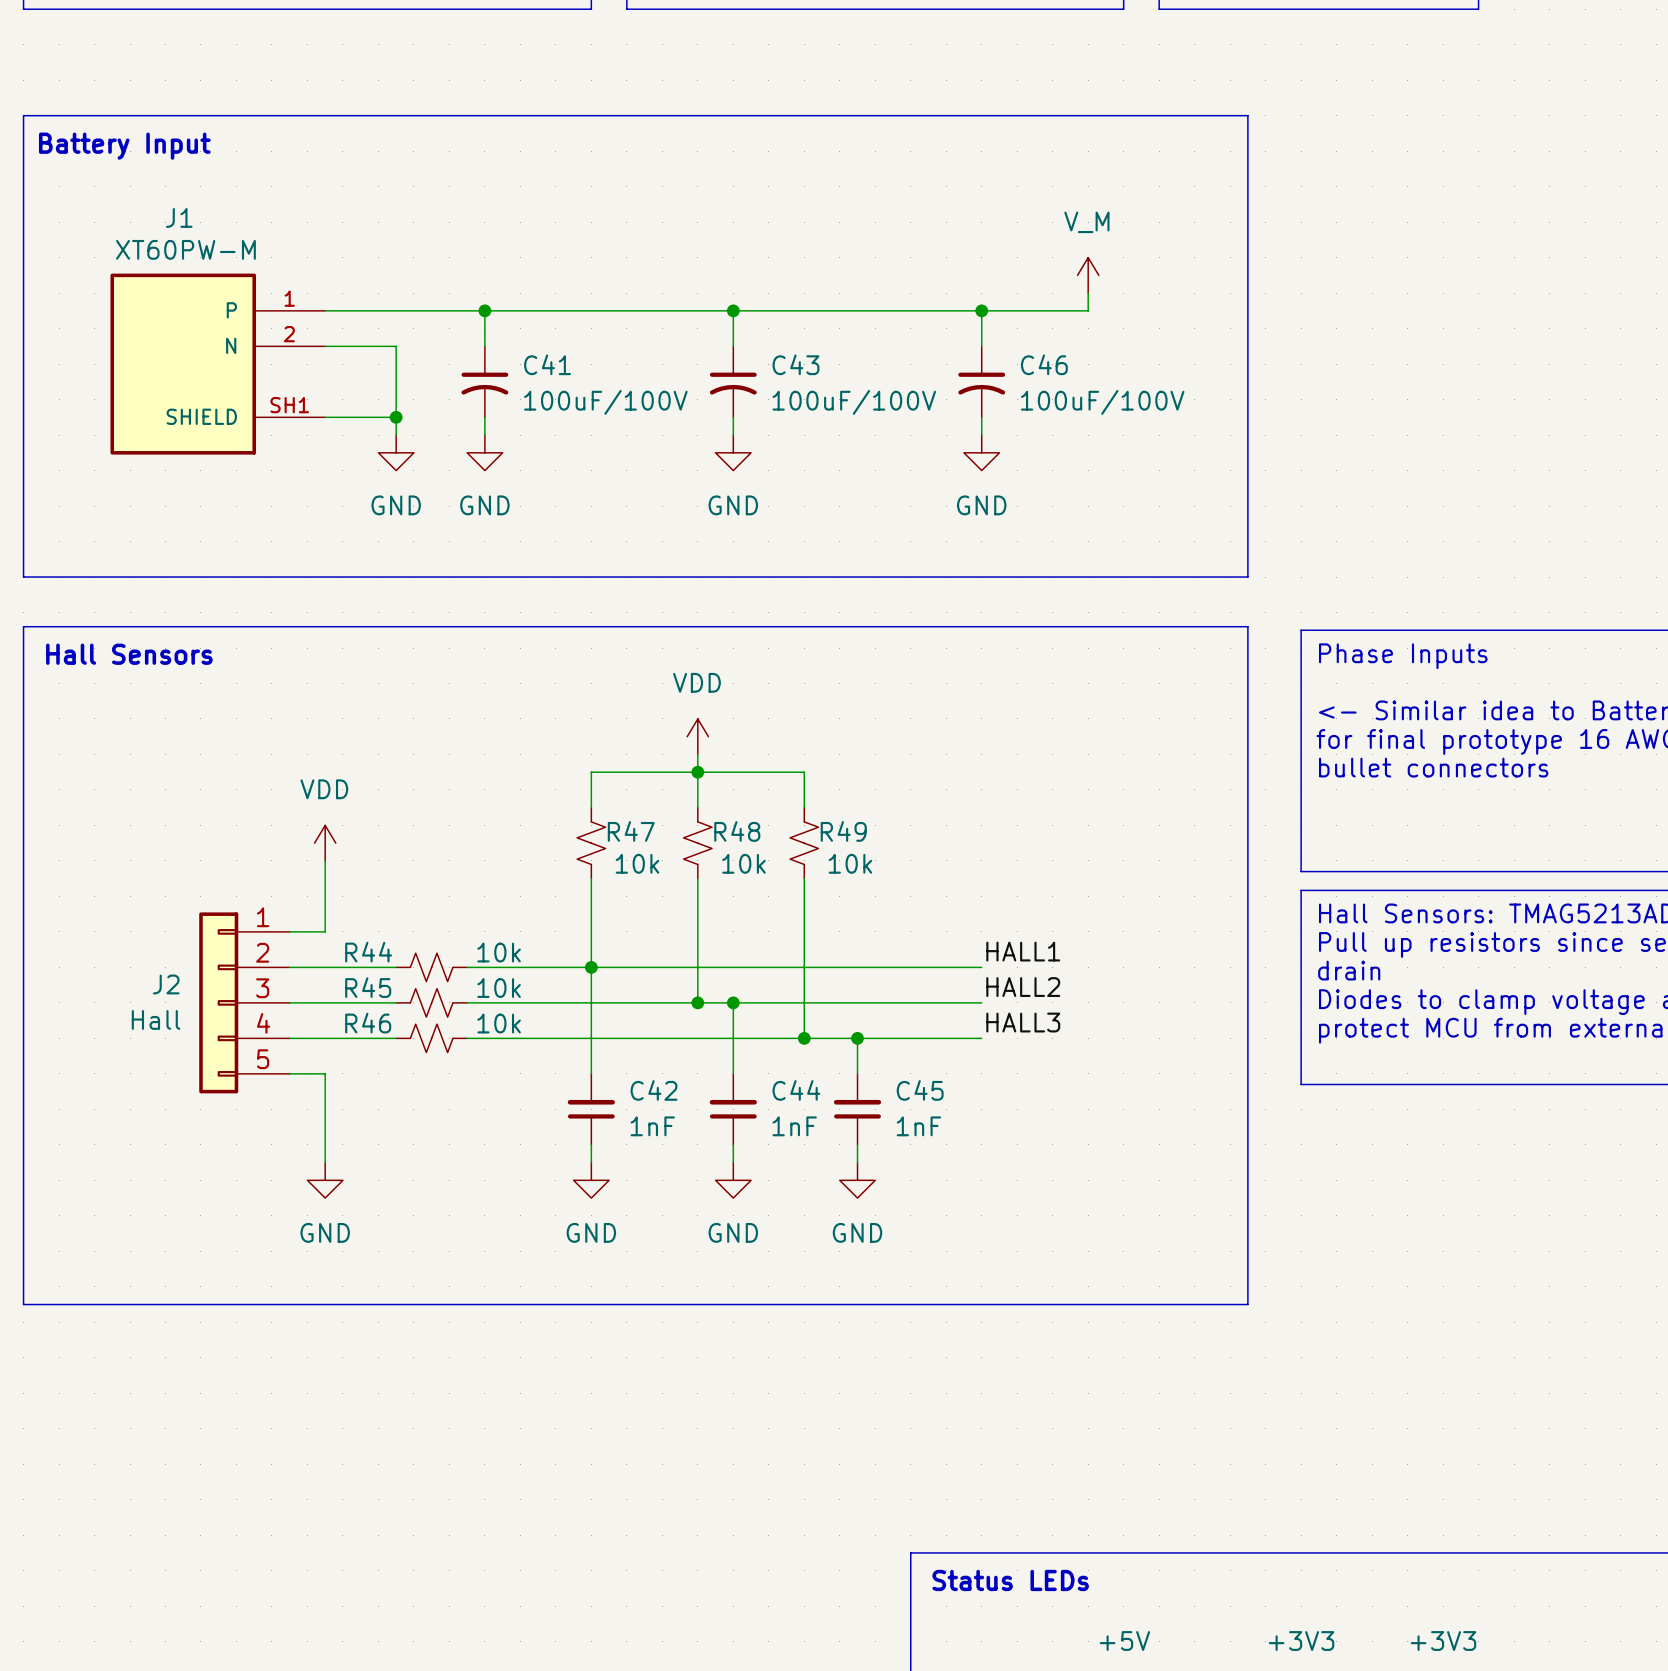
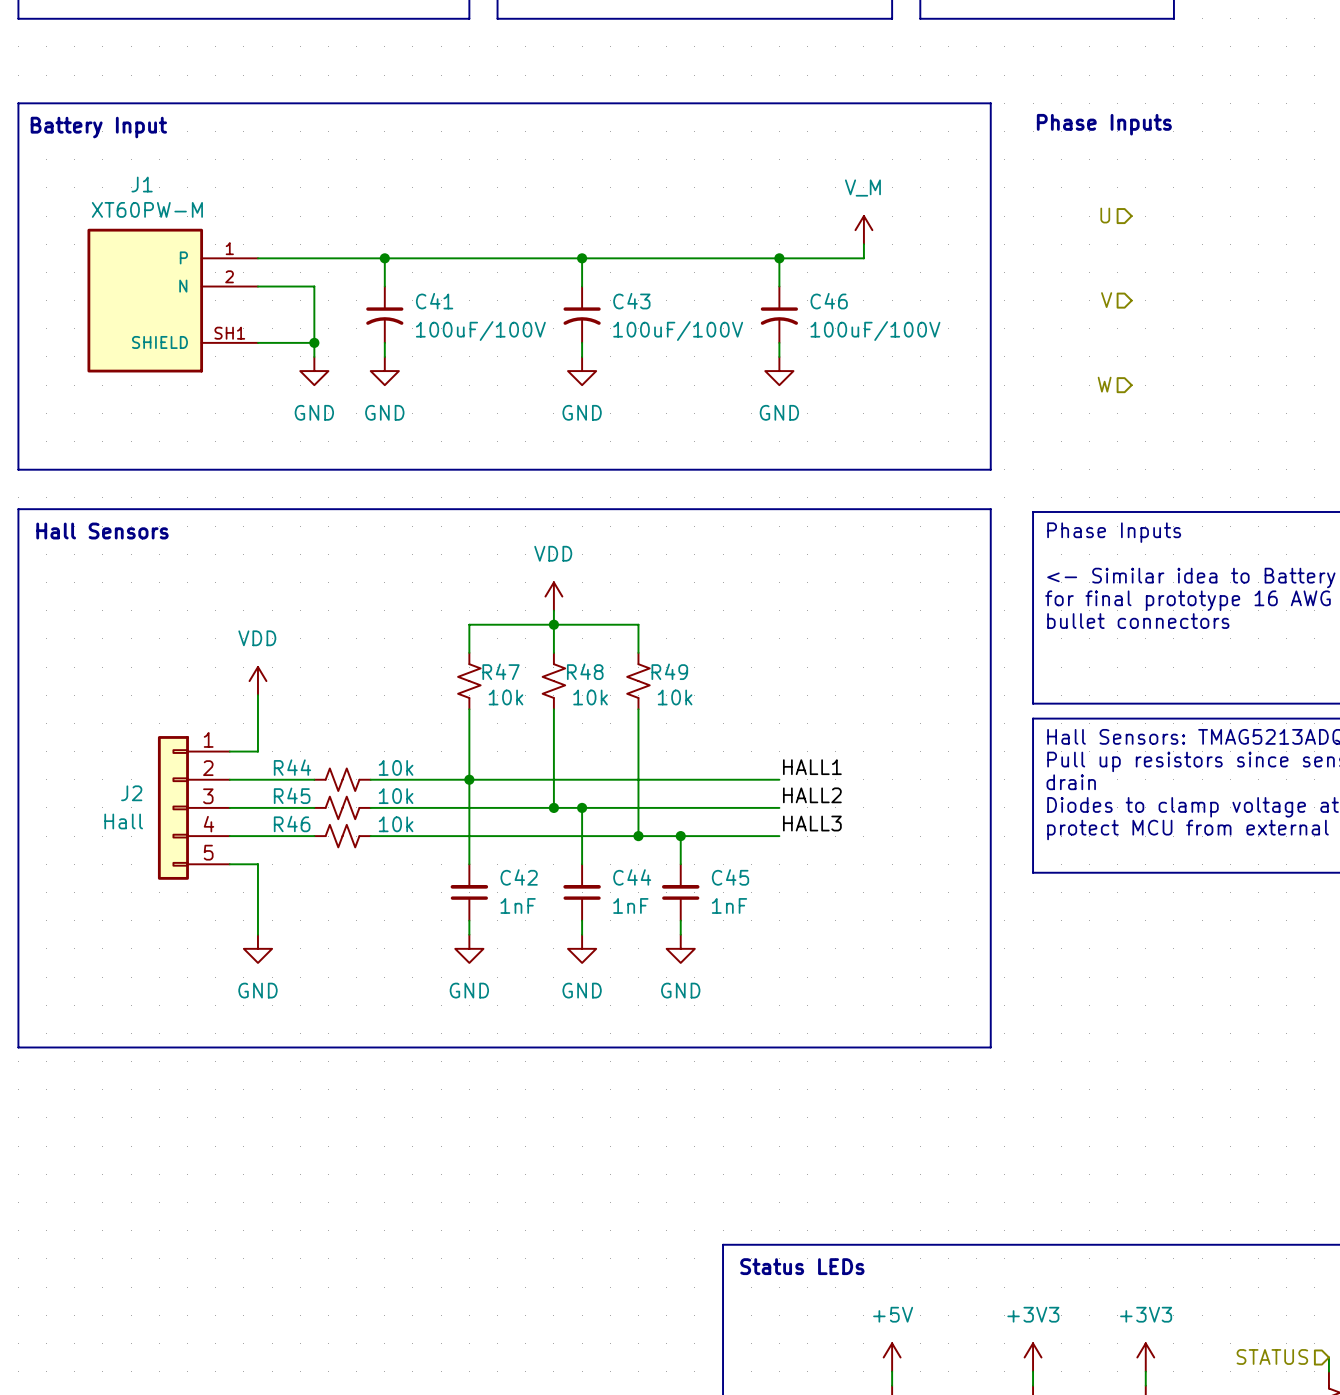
text: none -> Phase Inputs (1104, 124)
hierarchical label: none -> U (1105, 215)
hierarchical label: none -> V (1106, 300)
hierarchical label: none -> W (1104, 384)

